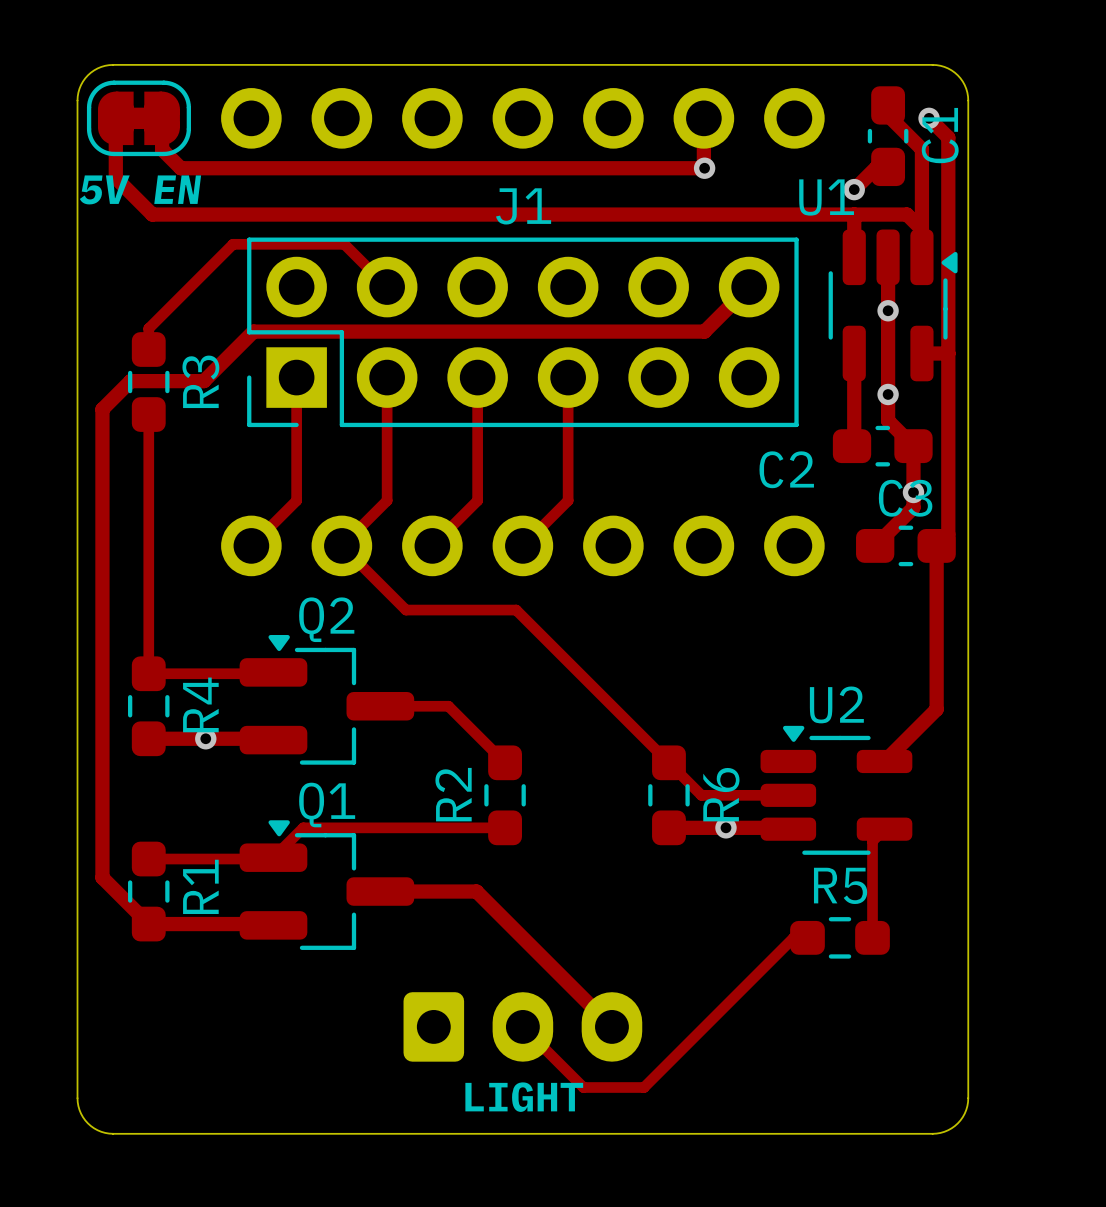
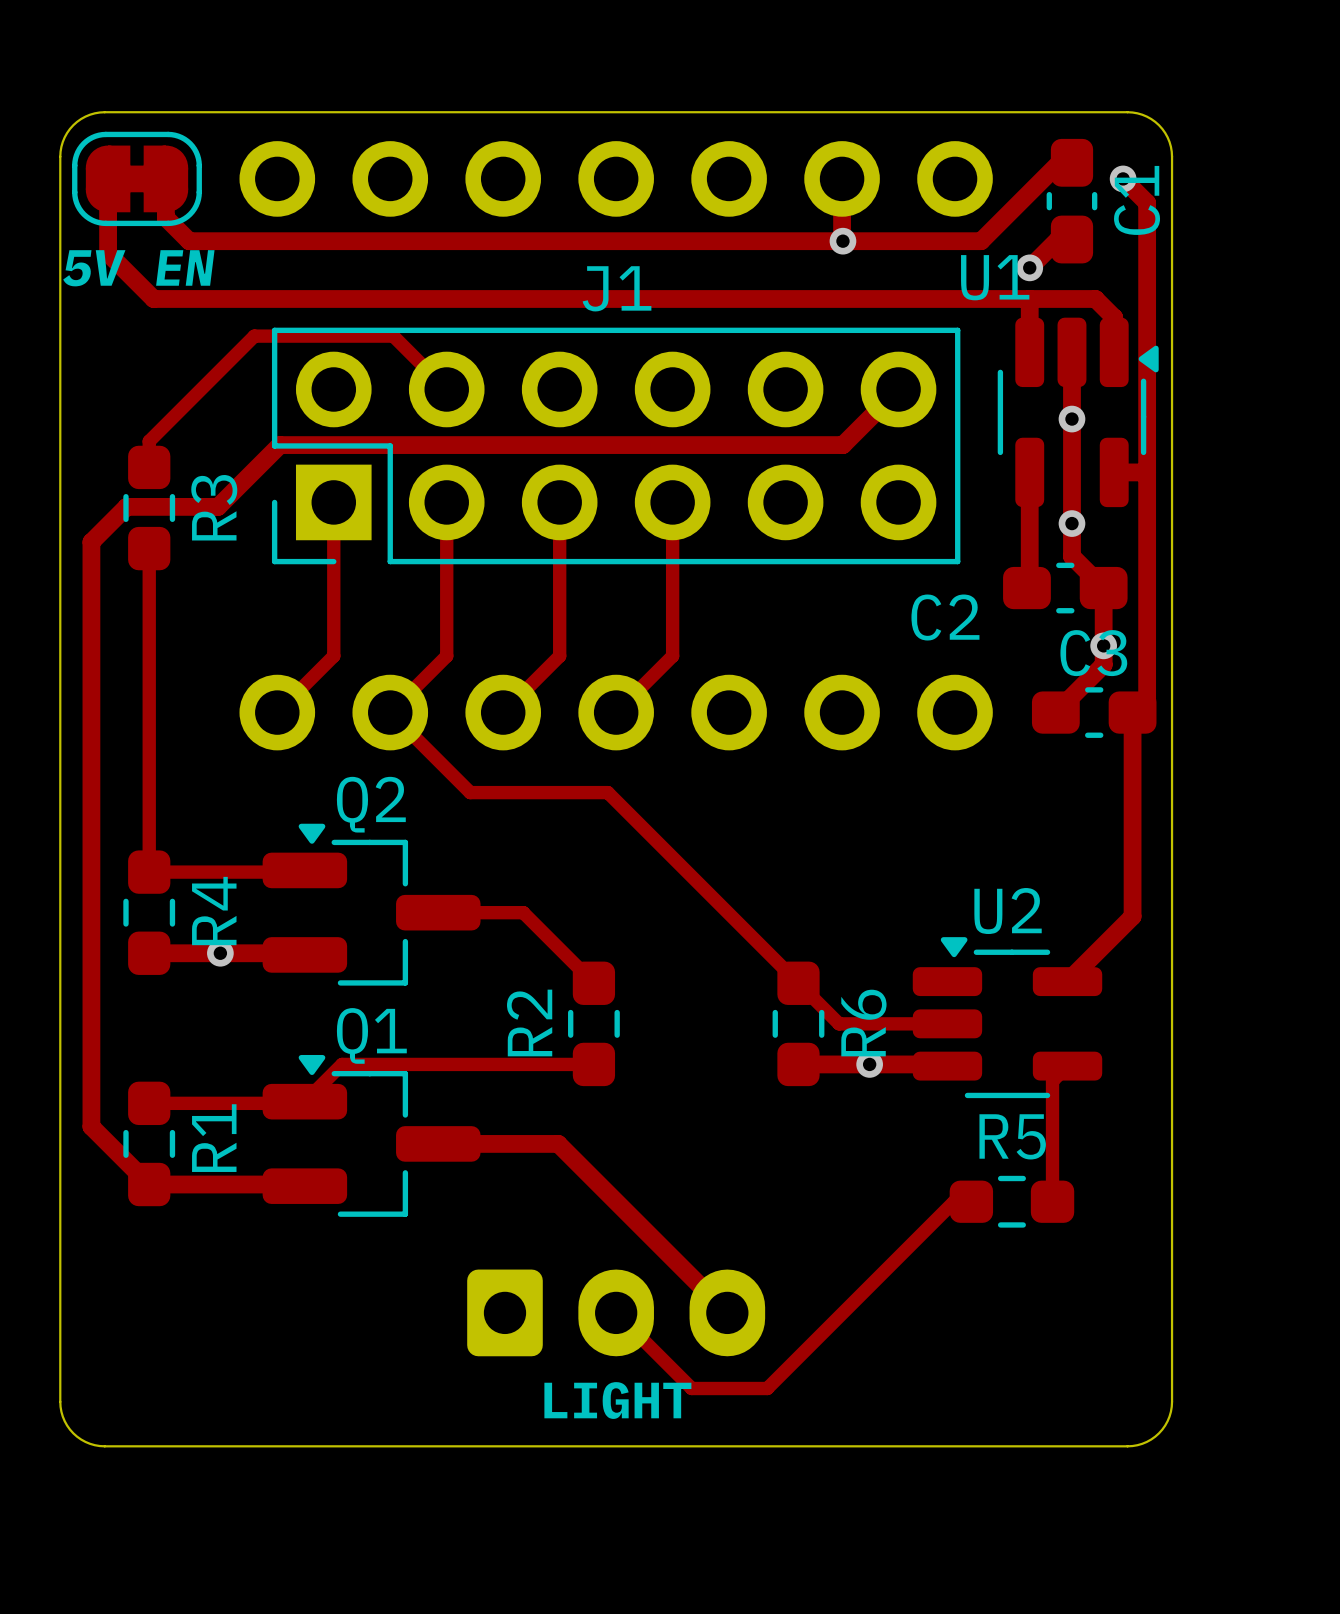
track: (888, 105) (888, 115) (921, 149) (921, 229) -> (1071, 162) (1059, 162) (981, 241) (842, 241)

